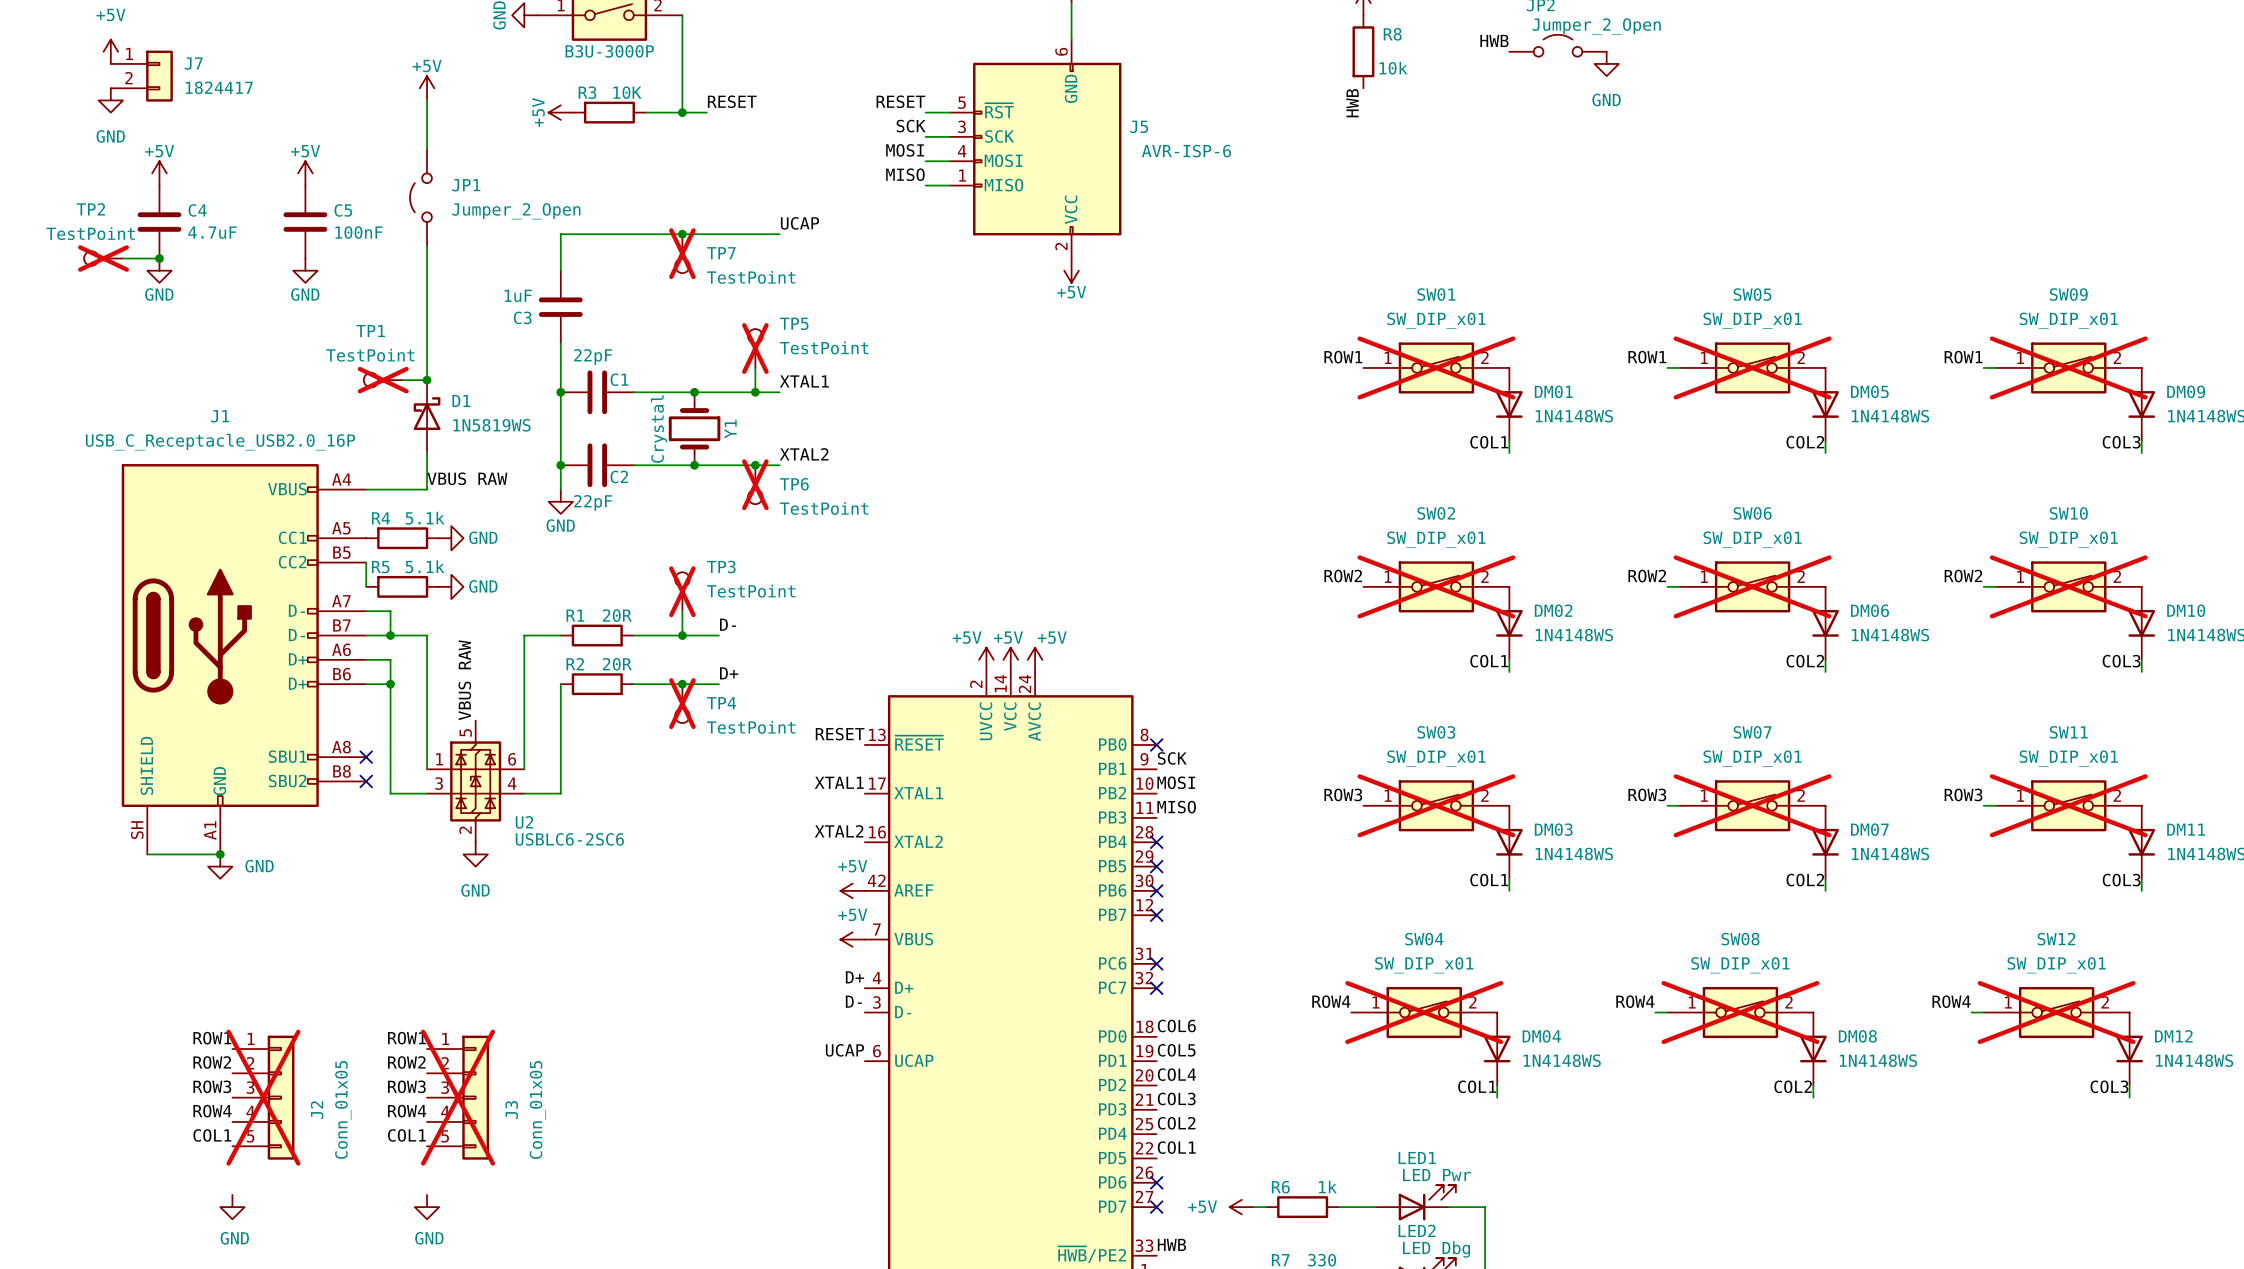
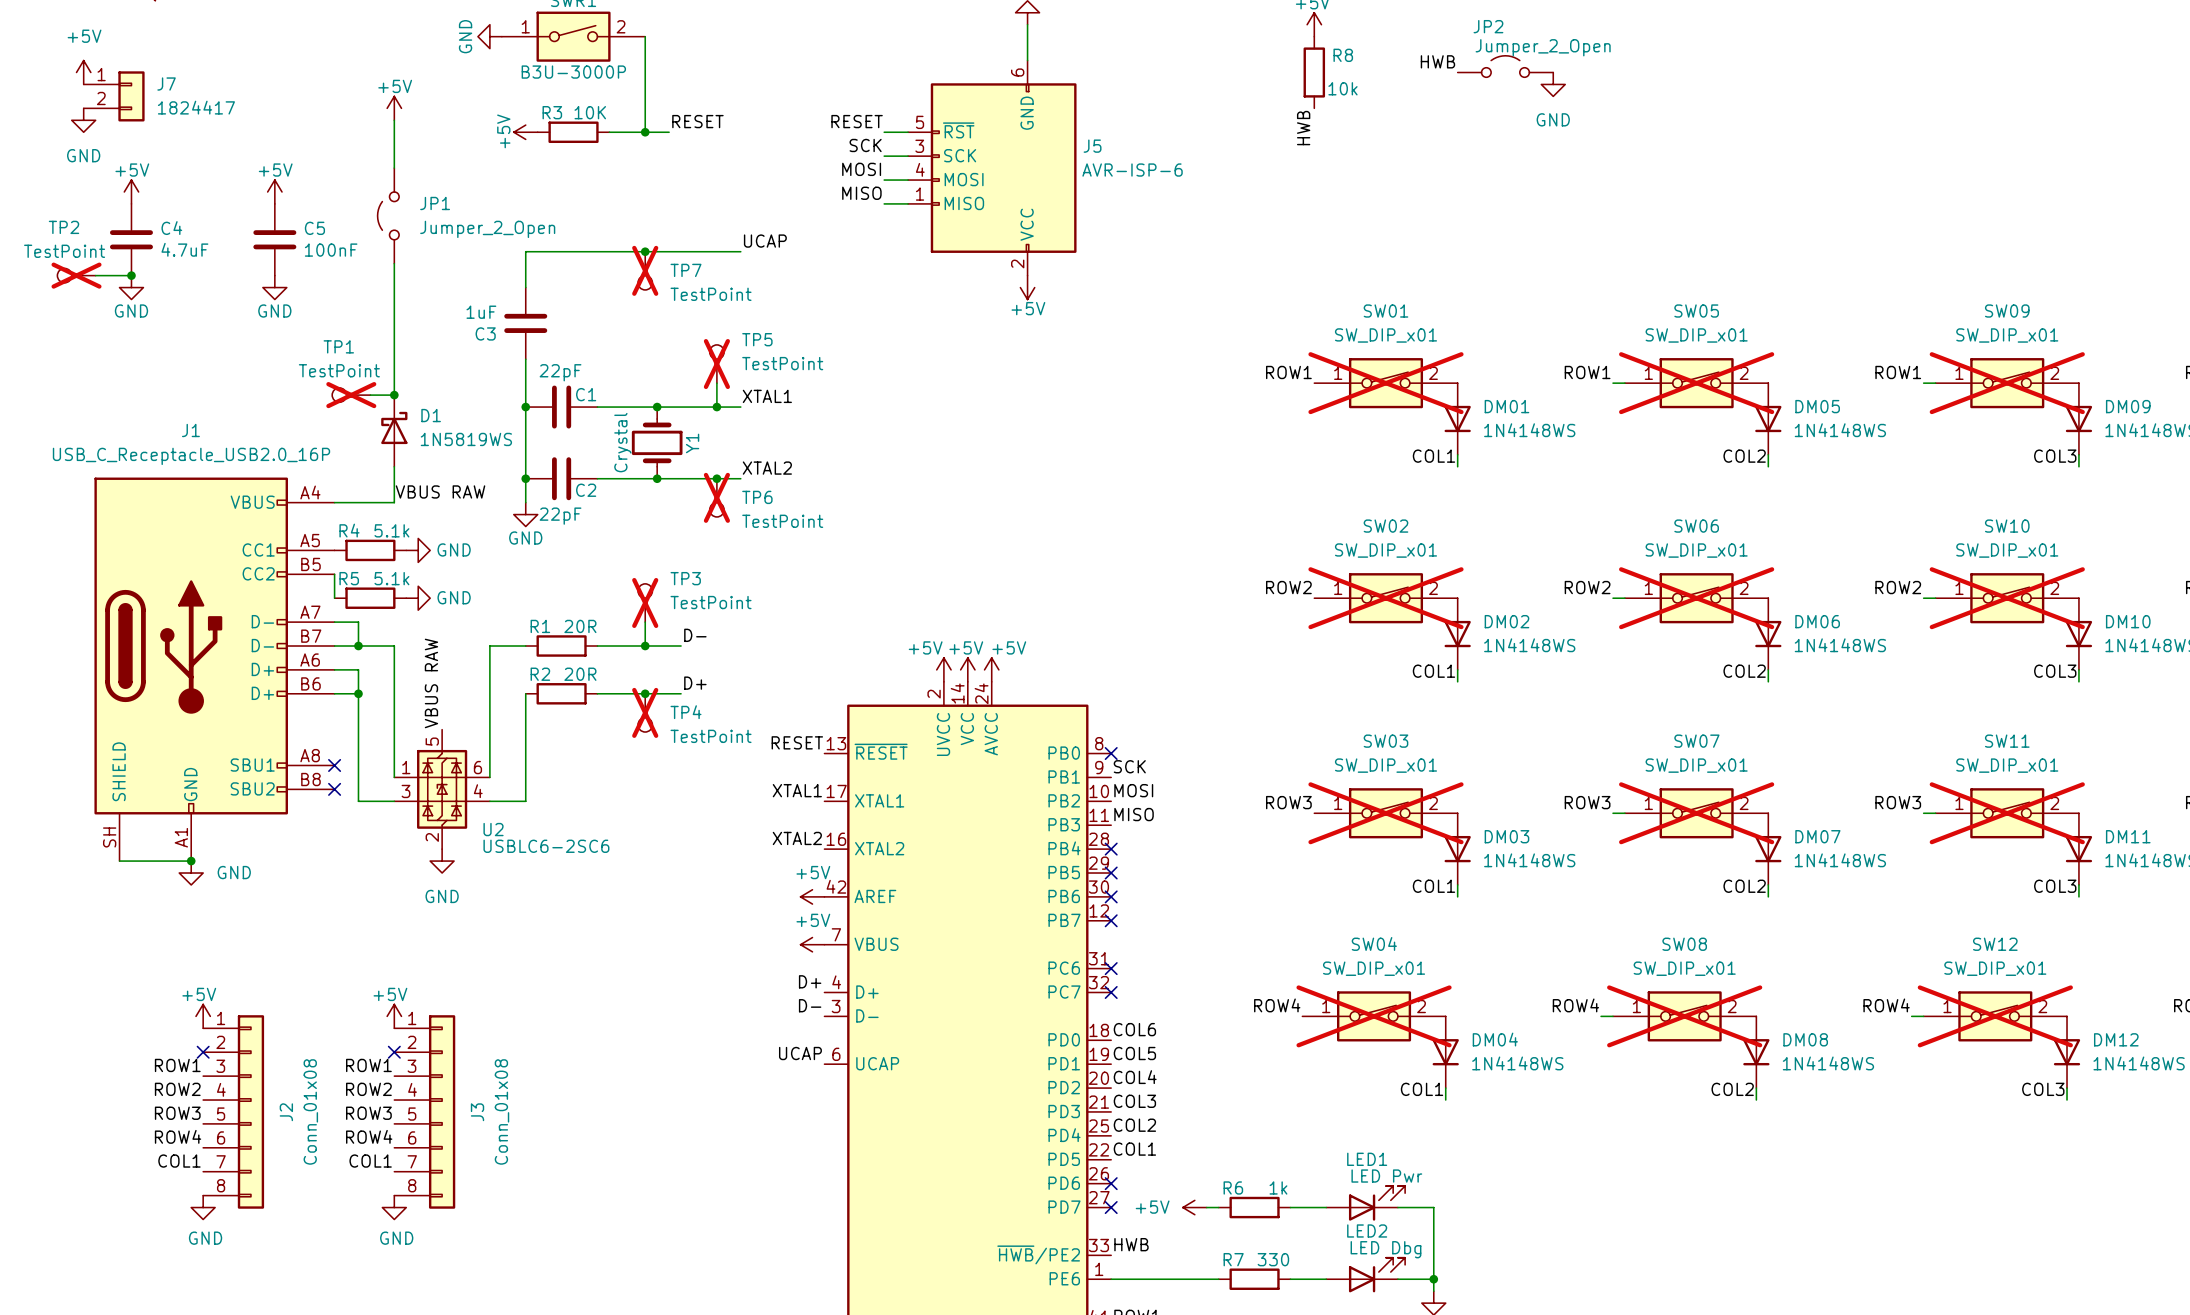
power symbol: none -> +5V (203, 1016)
power symbol: none -> +5V (394, 1016)
J2 symbol: [232, 1035, 295, 1160] -> [203, 1015, 265, 1209]
J3 symbol: [427, 1035, 490, 1160] -> [394, 1015, 456, 1209]
label: ROW1 (212, 1038) -> none
label: ROW1 (406, 1038) -> none
no-connect mark: none -> (203, 1052)
no-connect mark: none -> (394, 1052)
label: ROW2 (212, 1062) -> ROW1 (177, 1065)
label: ROW2 (406, 1062) -> ROW1 (368, 1065)
label: ROW3 (212, 1086) -> ROW2 (177, 1089)
label: ROW3 (406, 1086) -> ROW2 (368, 1089)
J2 do-not-place cross: (263, 1097) -> none
J3 do-not-place cross: (458, 1097) -> none
J2 value: Conn_01x05 (343, 1109) -> Conn_01x08 (310, 1111)
J3 value: Conn_01x05 (537, 1109) -> Conn_01x08 (501, 1111)
label: ROW4 (212, 1111) -> ROW3 (177, 1113)
label: ROW4 (407, 1111) -> ROW3 (368, 1113)
label: COL1 (212, 1135) -> ROW4 (178, 1136)
label: COL1 (406, 1135) -> ROW4 (369, 1136)
label: none -> COL1 (179, 1161)
label: none -> COL1 (370, 1161)

